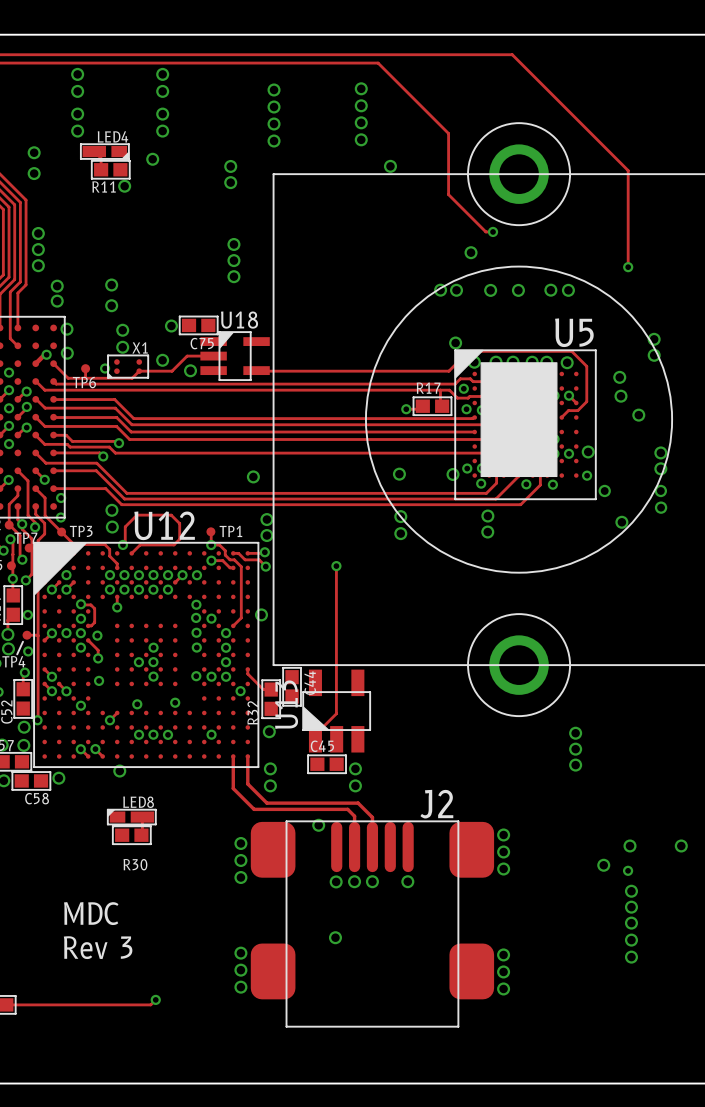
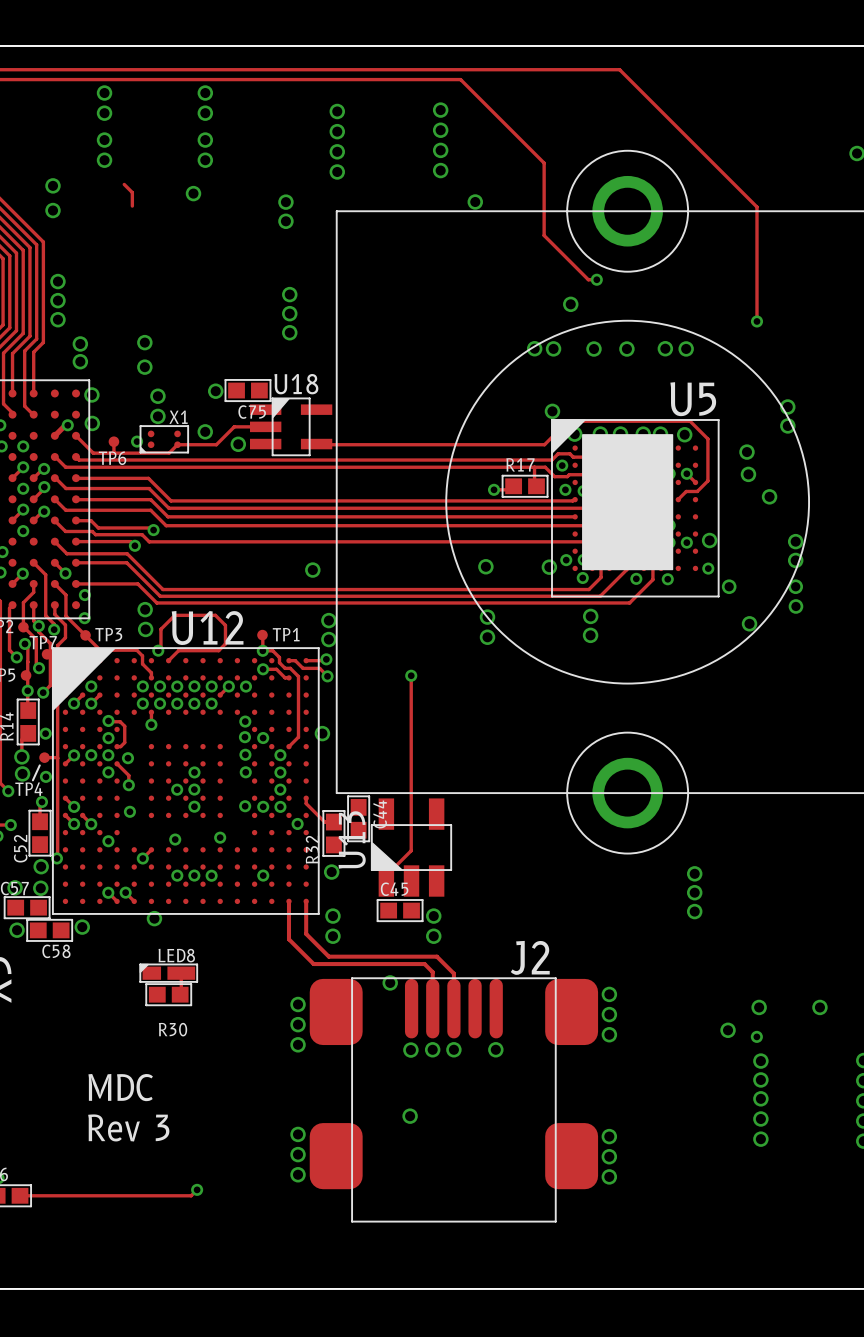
LED4: (104, 151) -> none
R11: (110, 169) -> none
via: (124, 186) -> none

